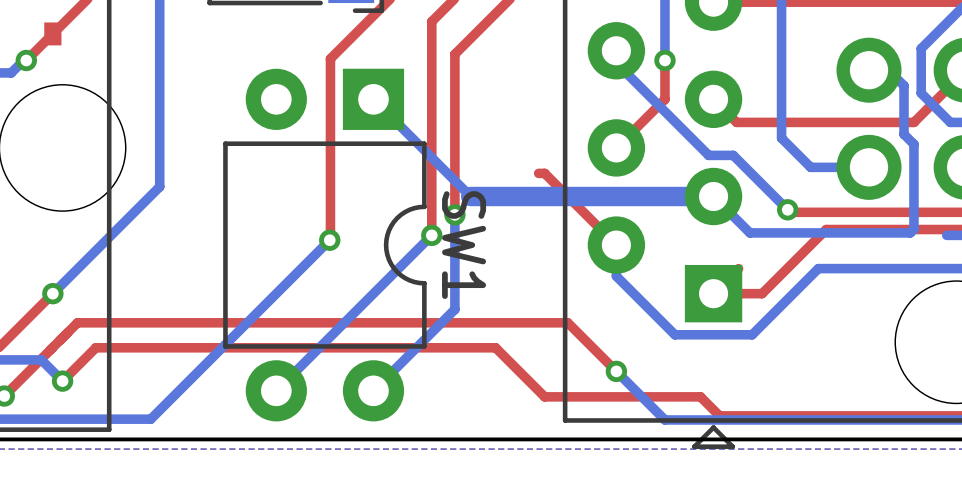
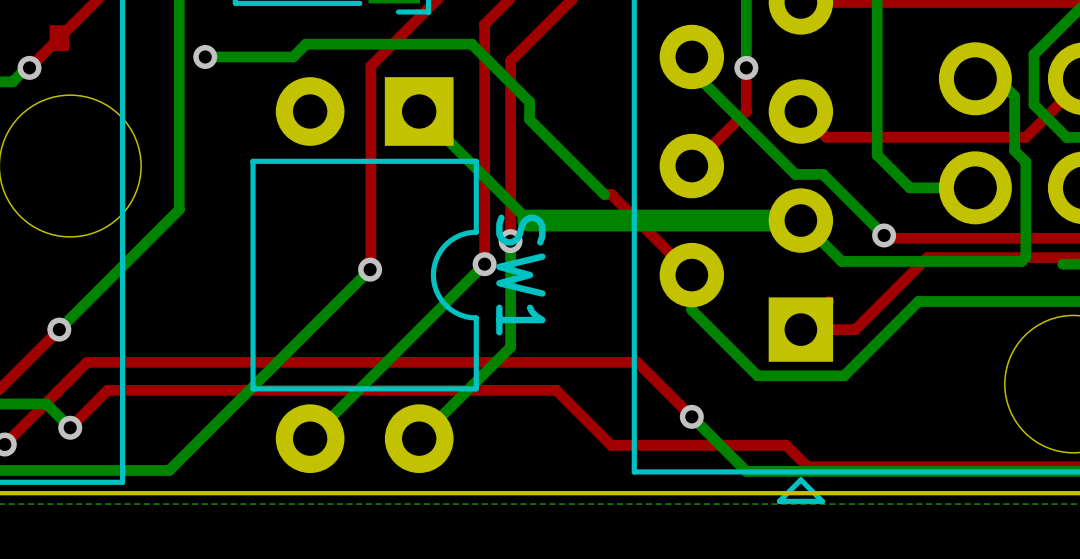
bottom track: none -> (205, 56) (293, 56) (305, 44) (471, 44) (529, 101) (529, 119) (604, 194)
via: none -> (205, 56)

